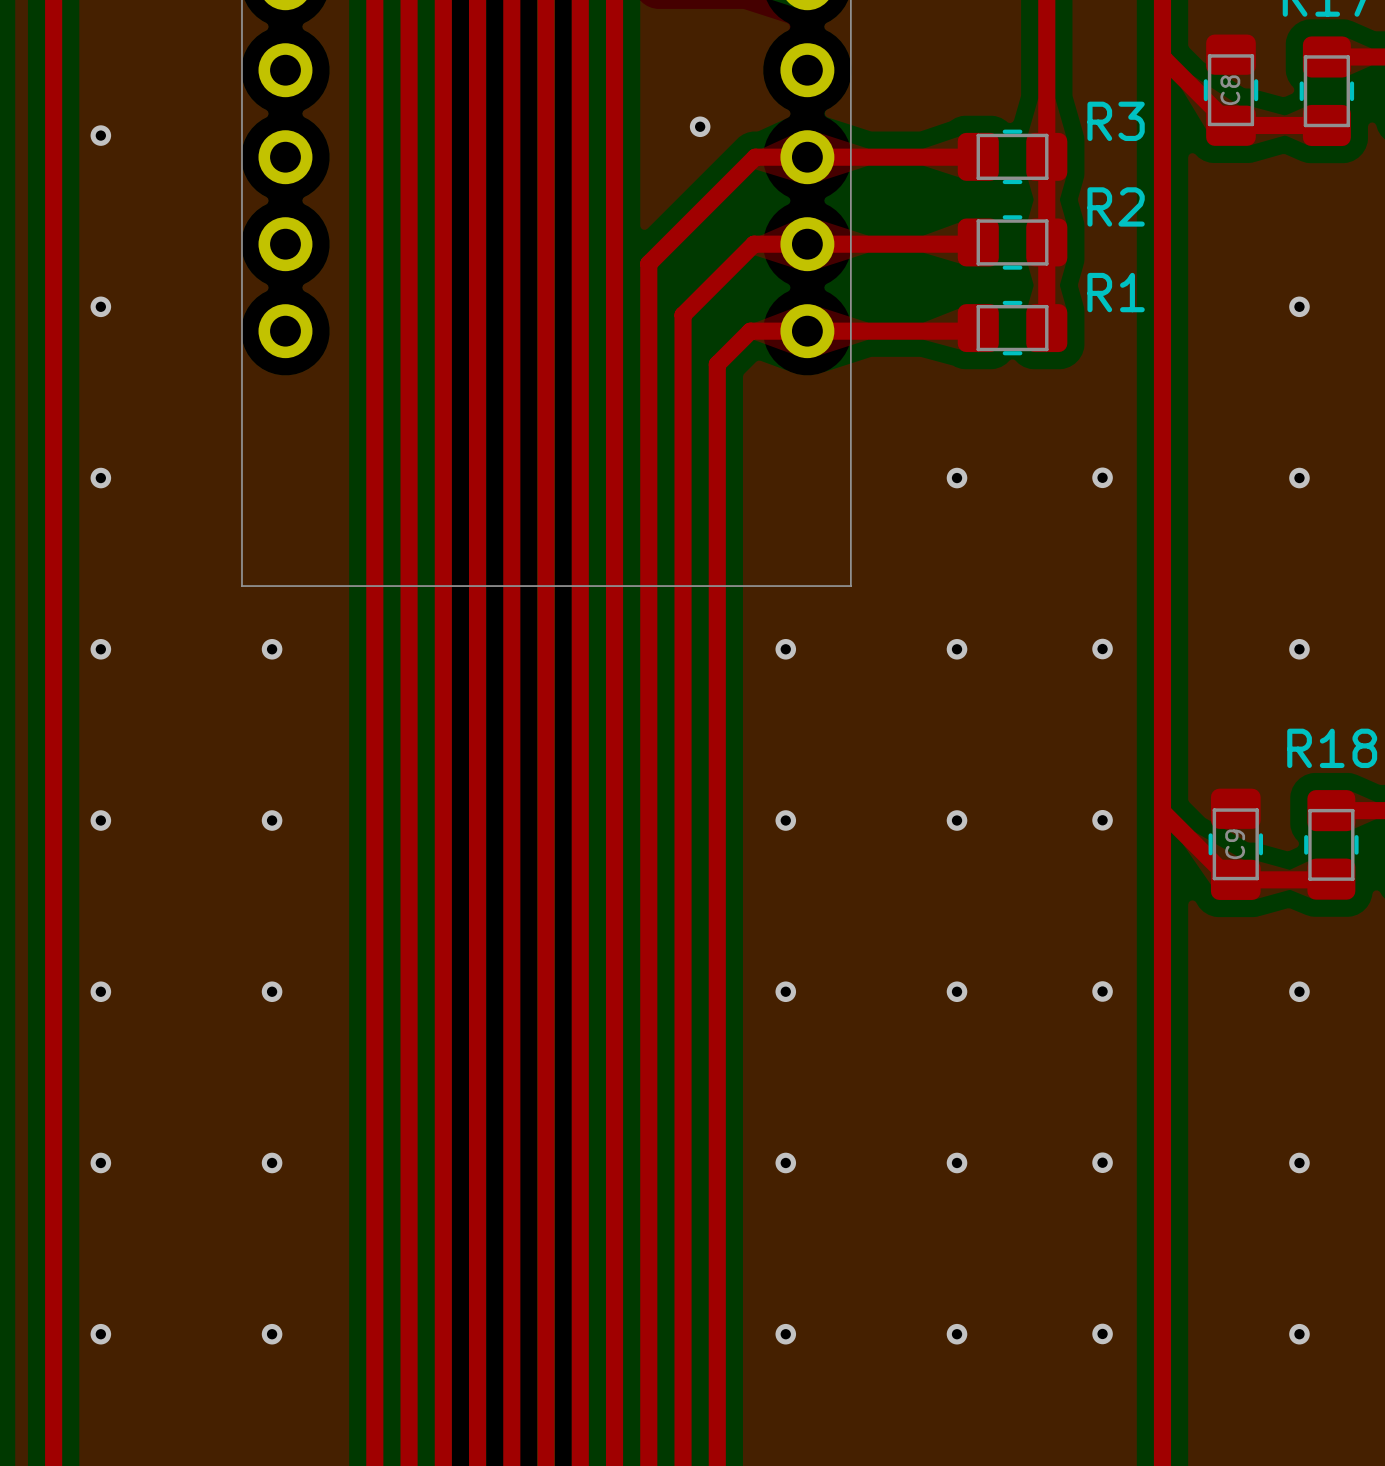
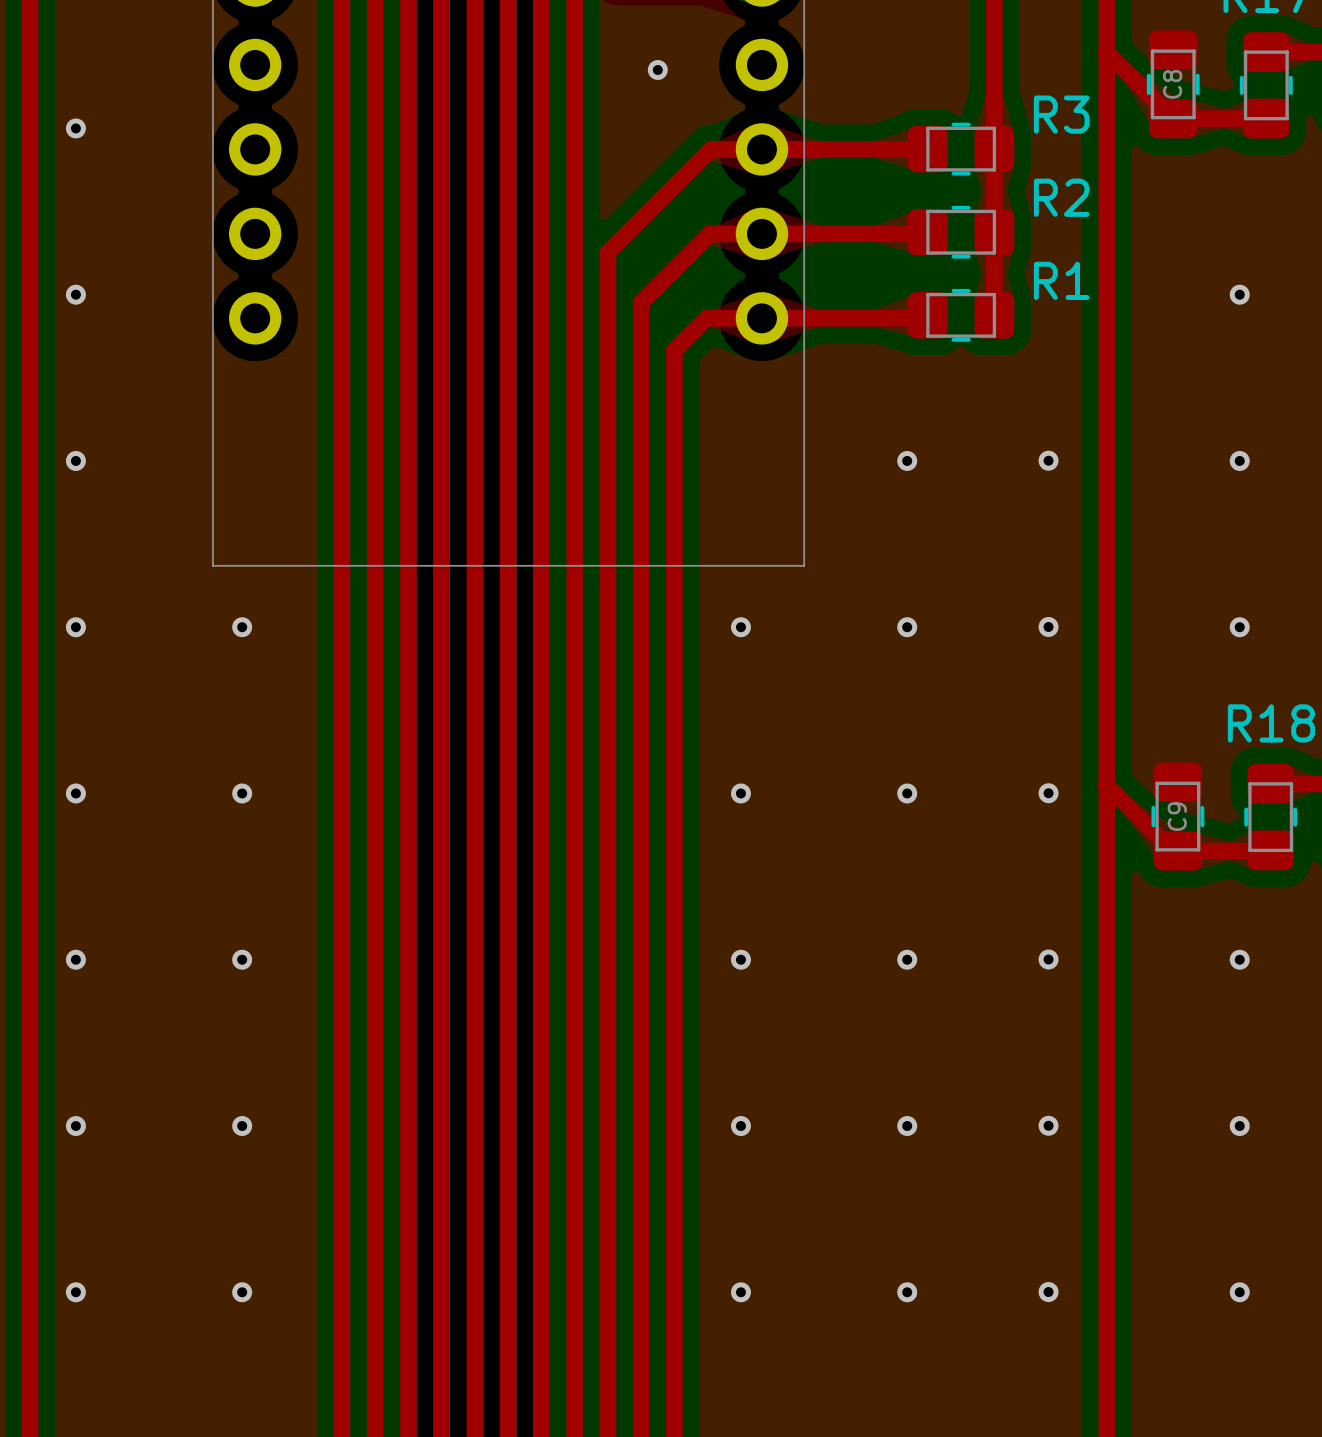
via position: (700, 126) -> (657, 70)

